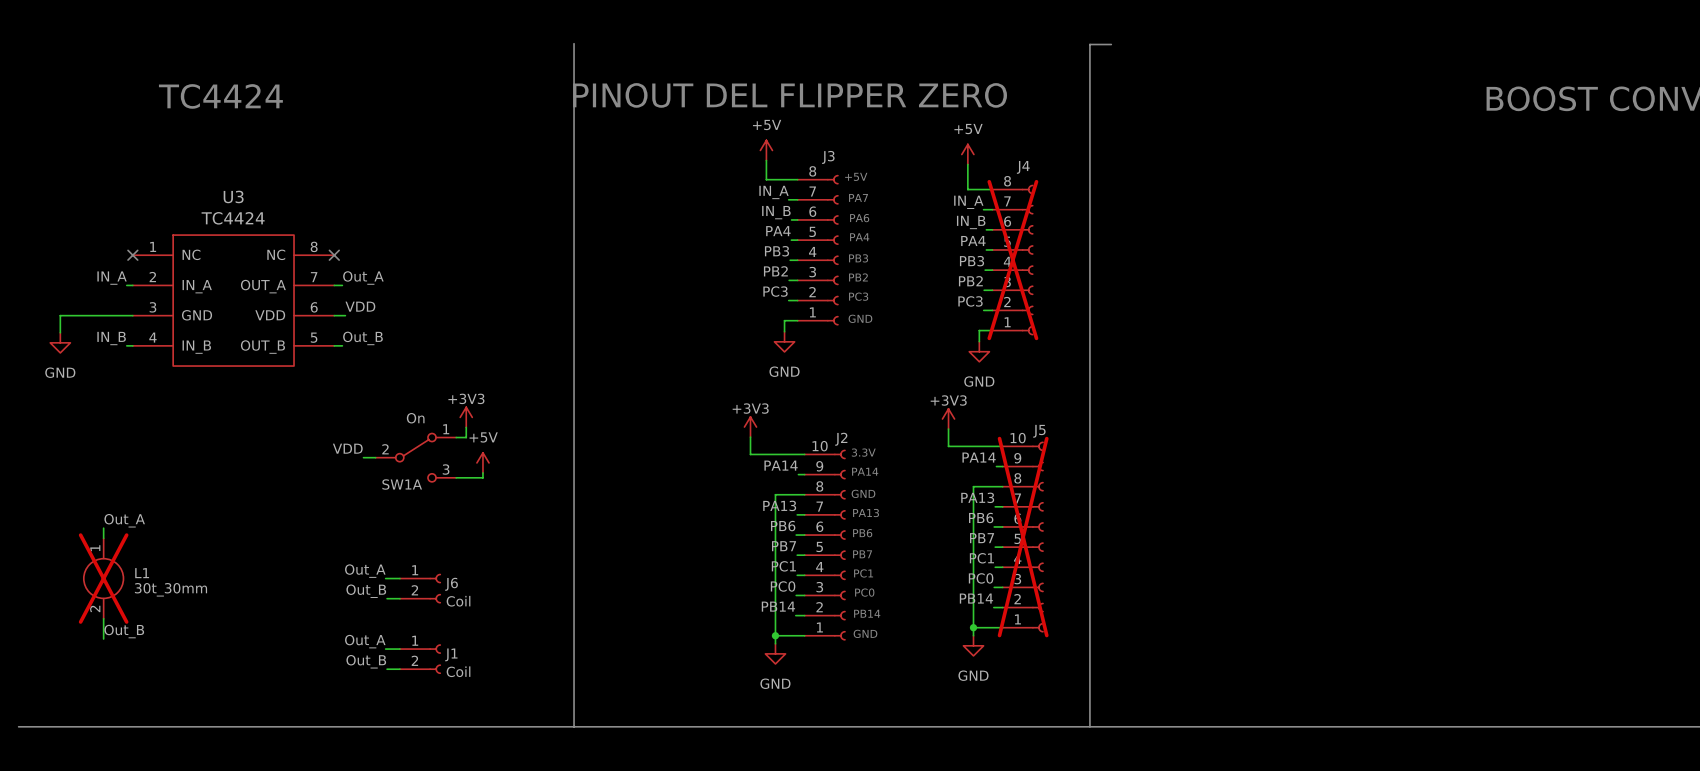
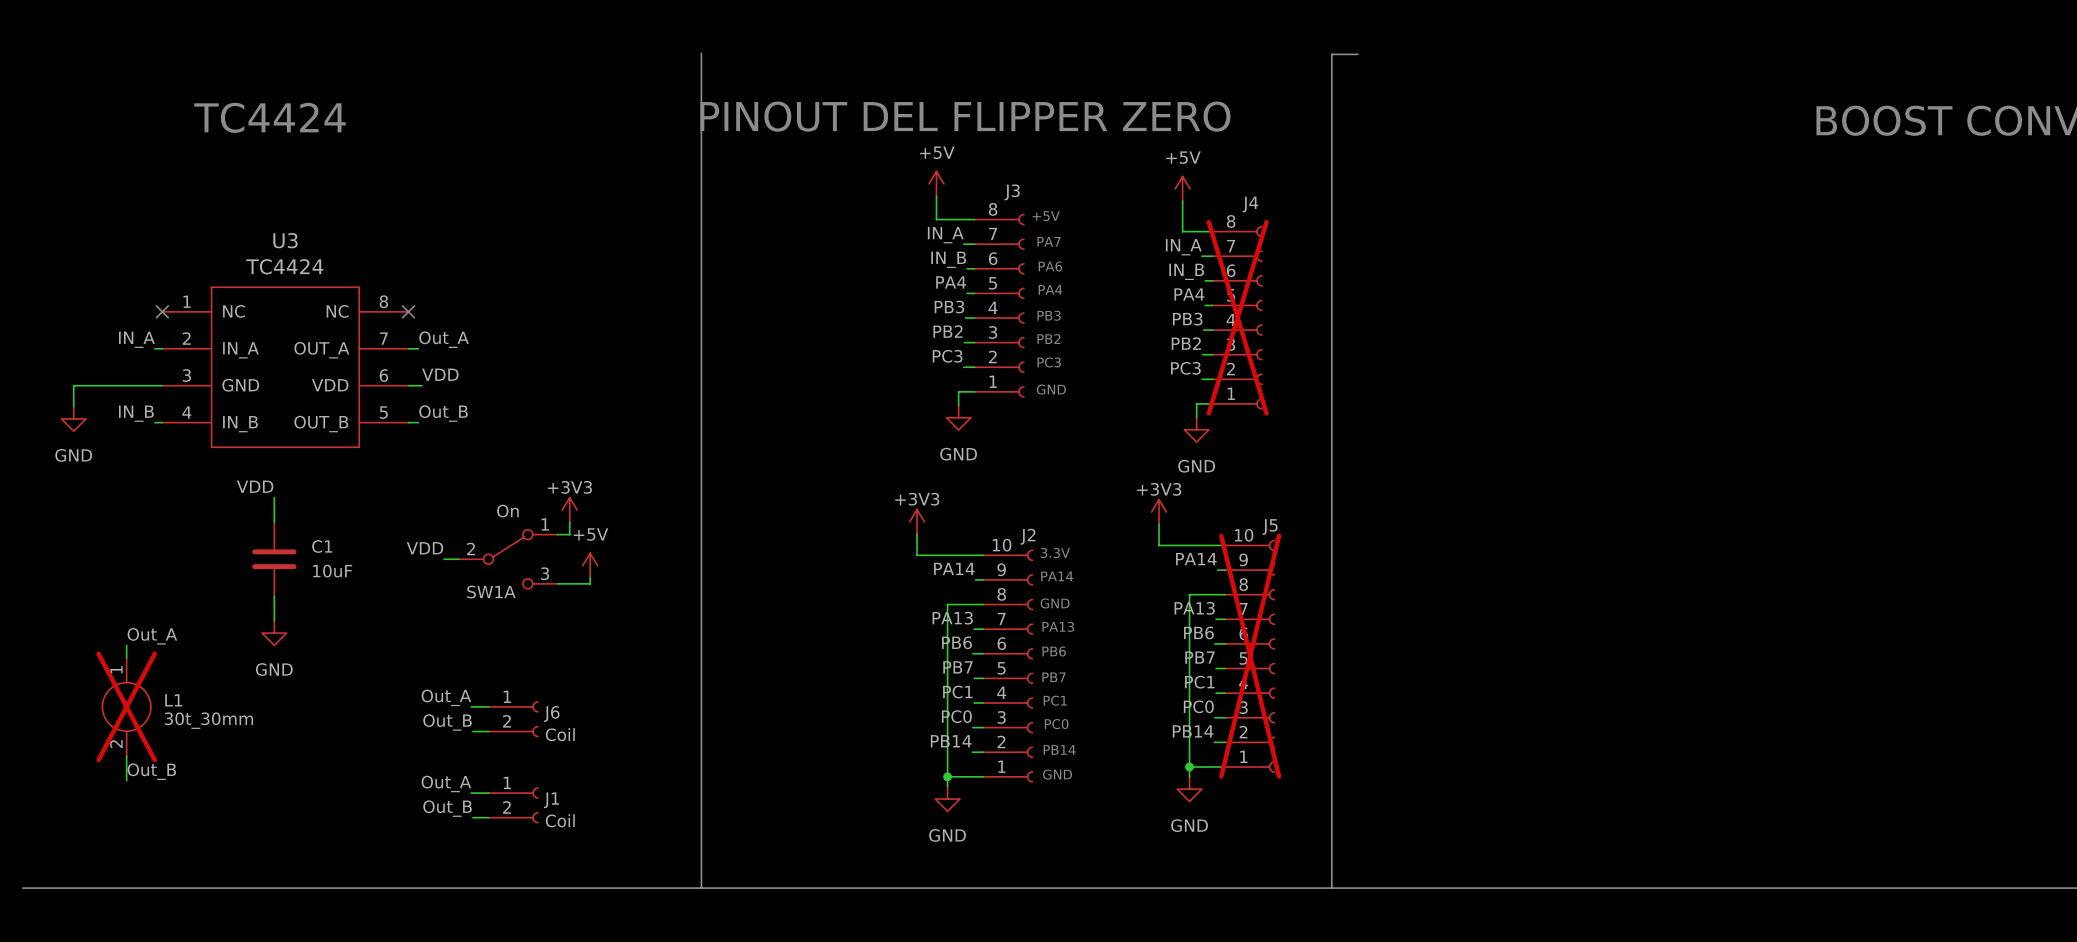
label: none -> VDD (255, 486)
wire: none -> (274, 497) (274, 522)
C1: none -> 10uF (274, 559)
wire: none -> (274, 596) (274, 620)
power symbol: none -> GND (274, 633)

